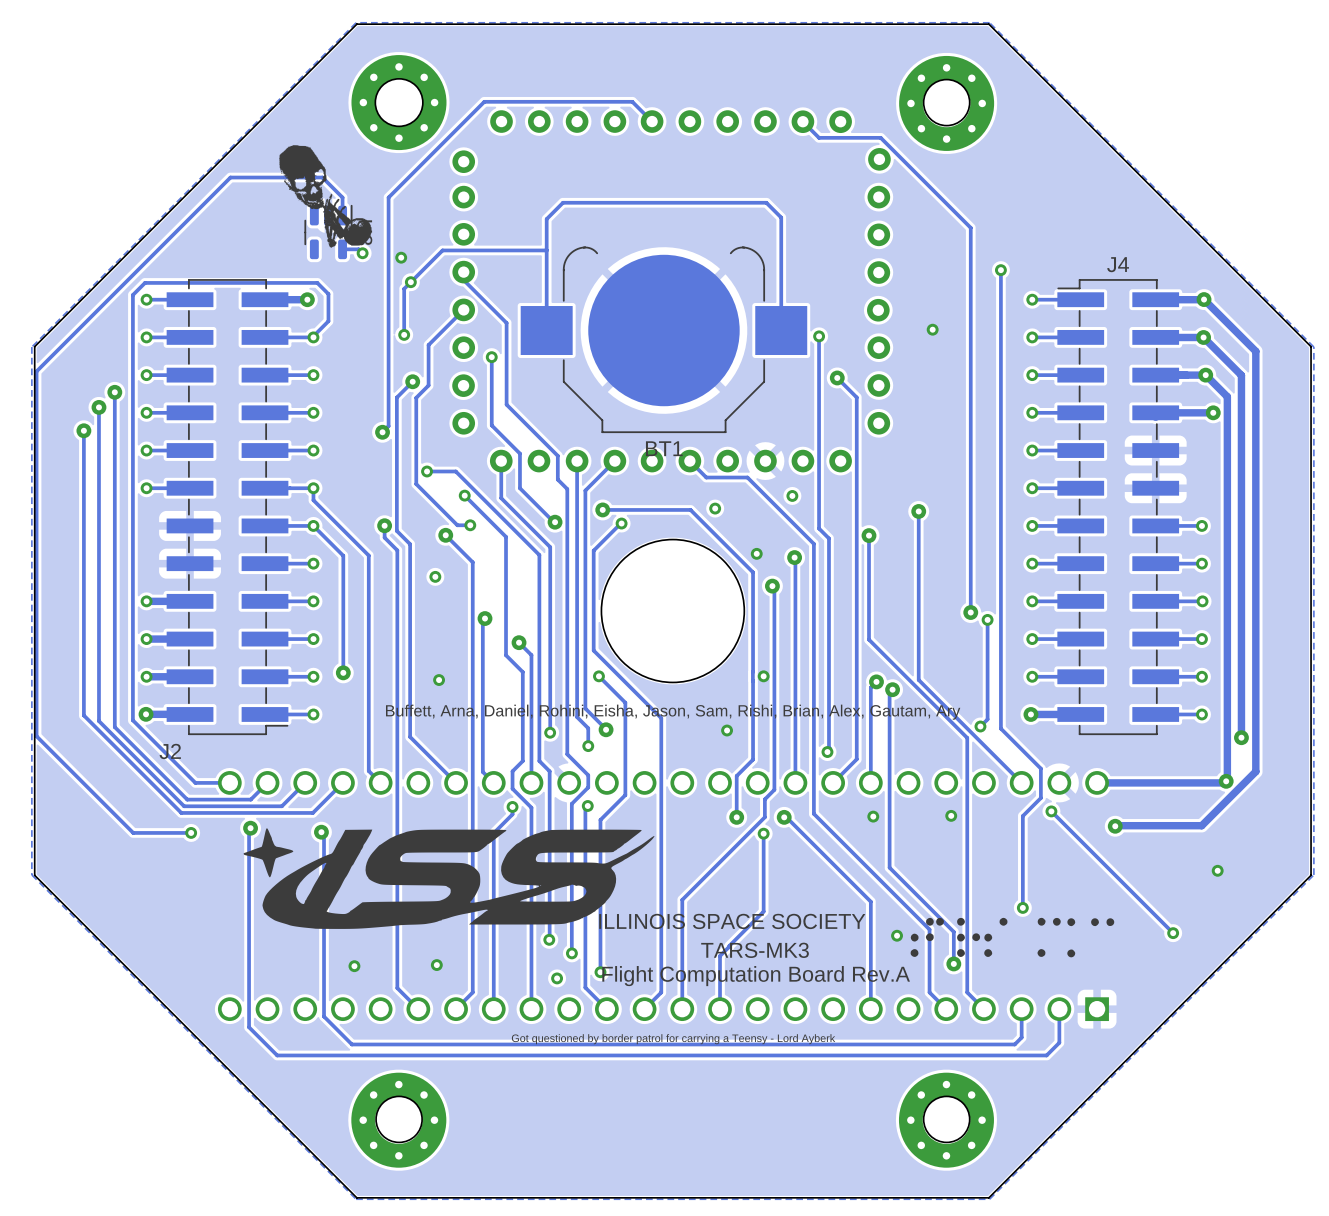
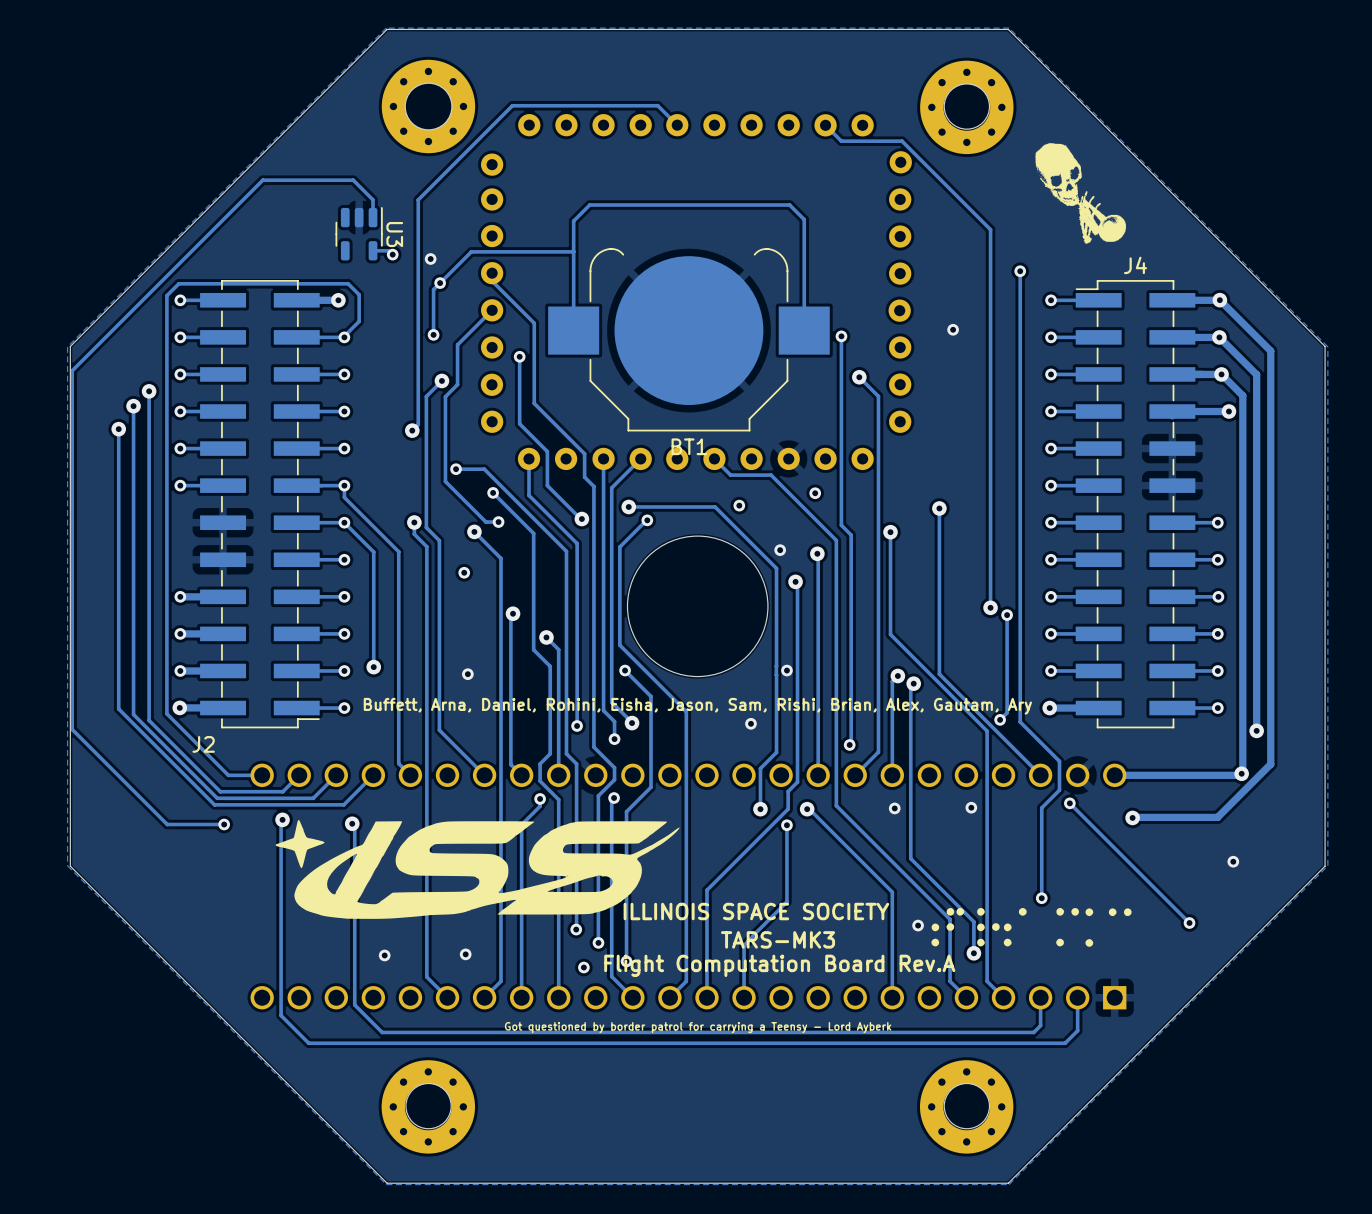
drawing: none -> [1035, 143, 1127, 244]
drawing: [279, 145, 372, 248] -> none

